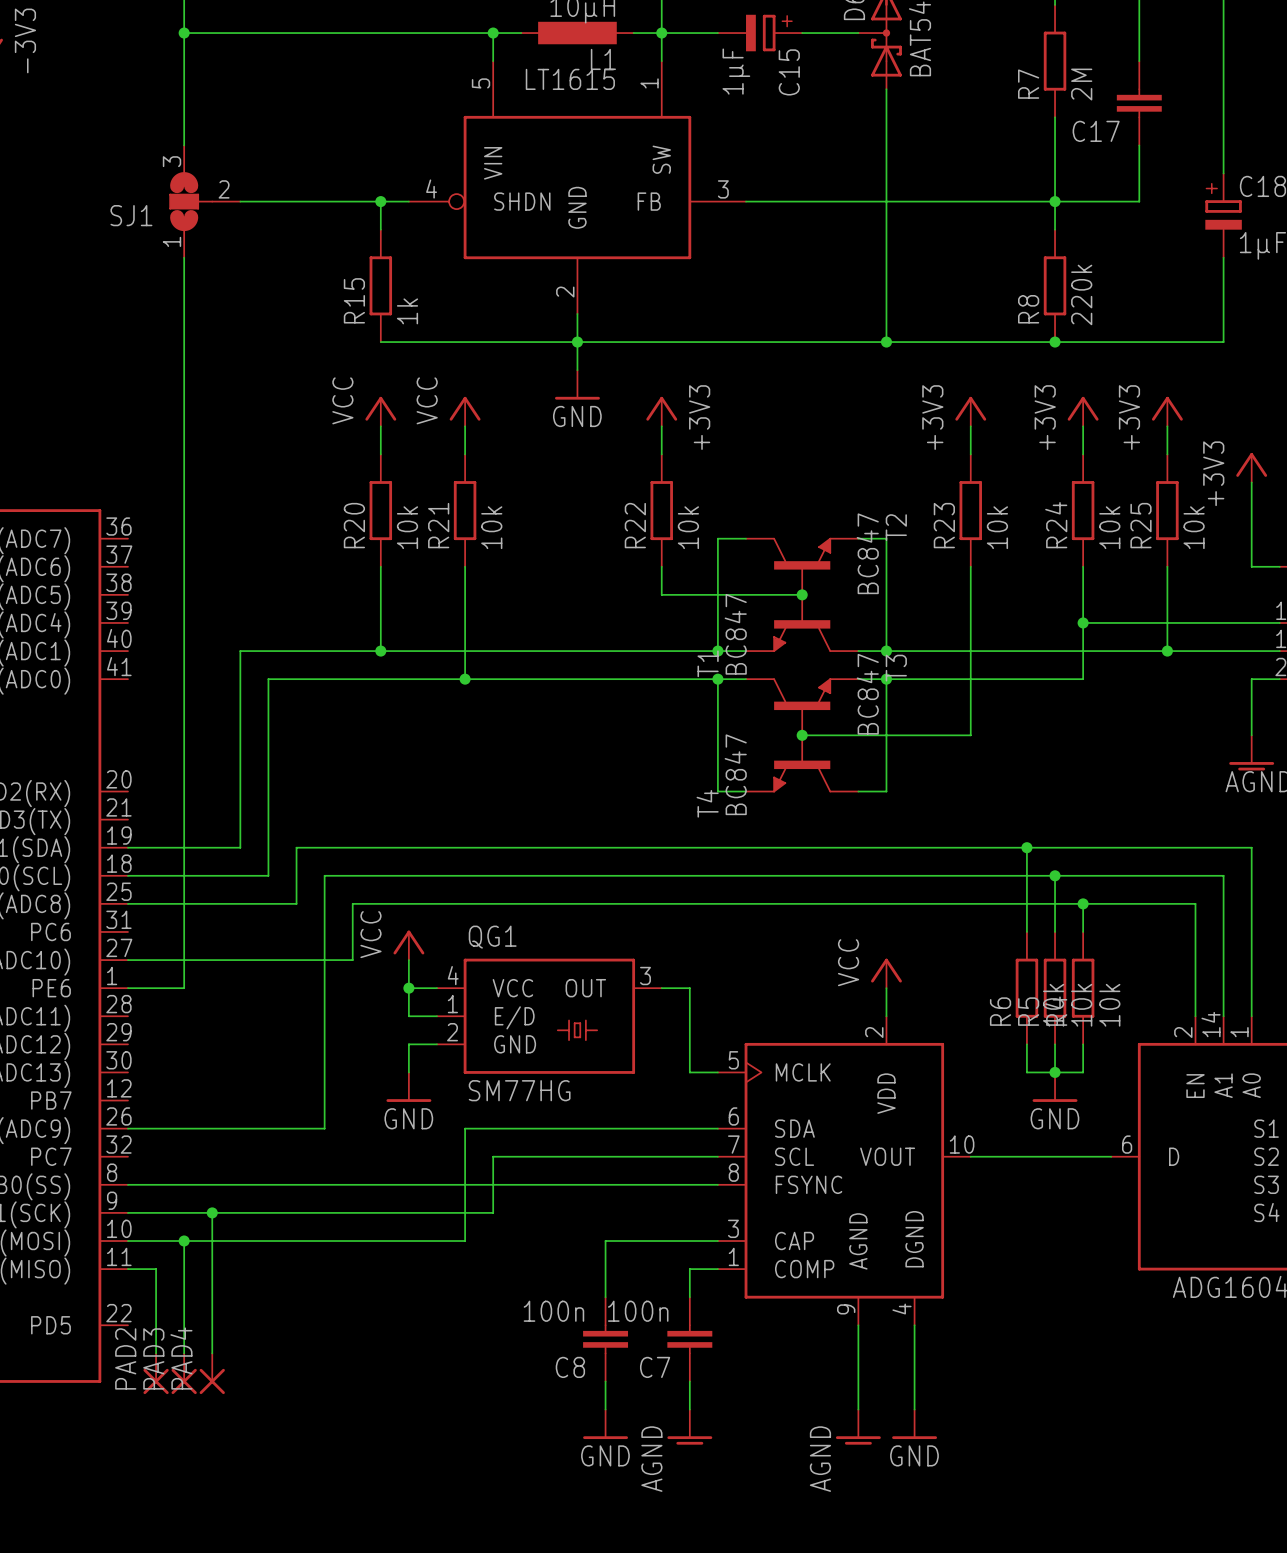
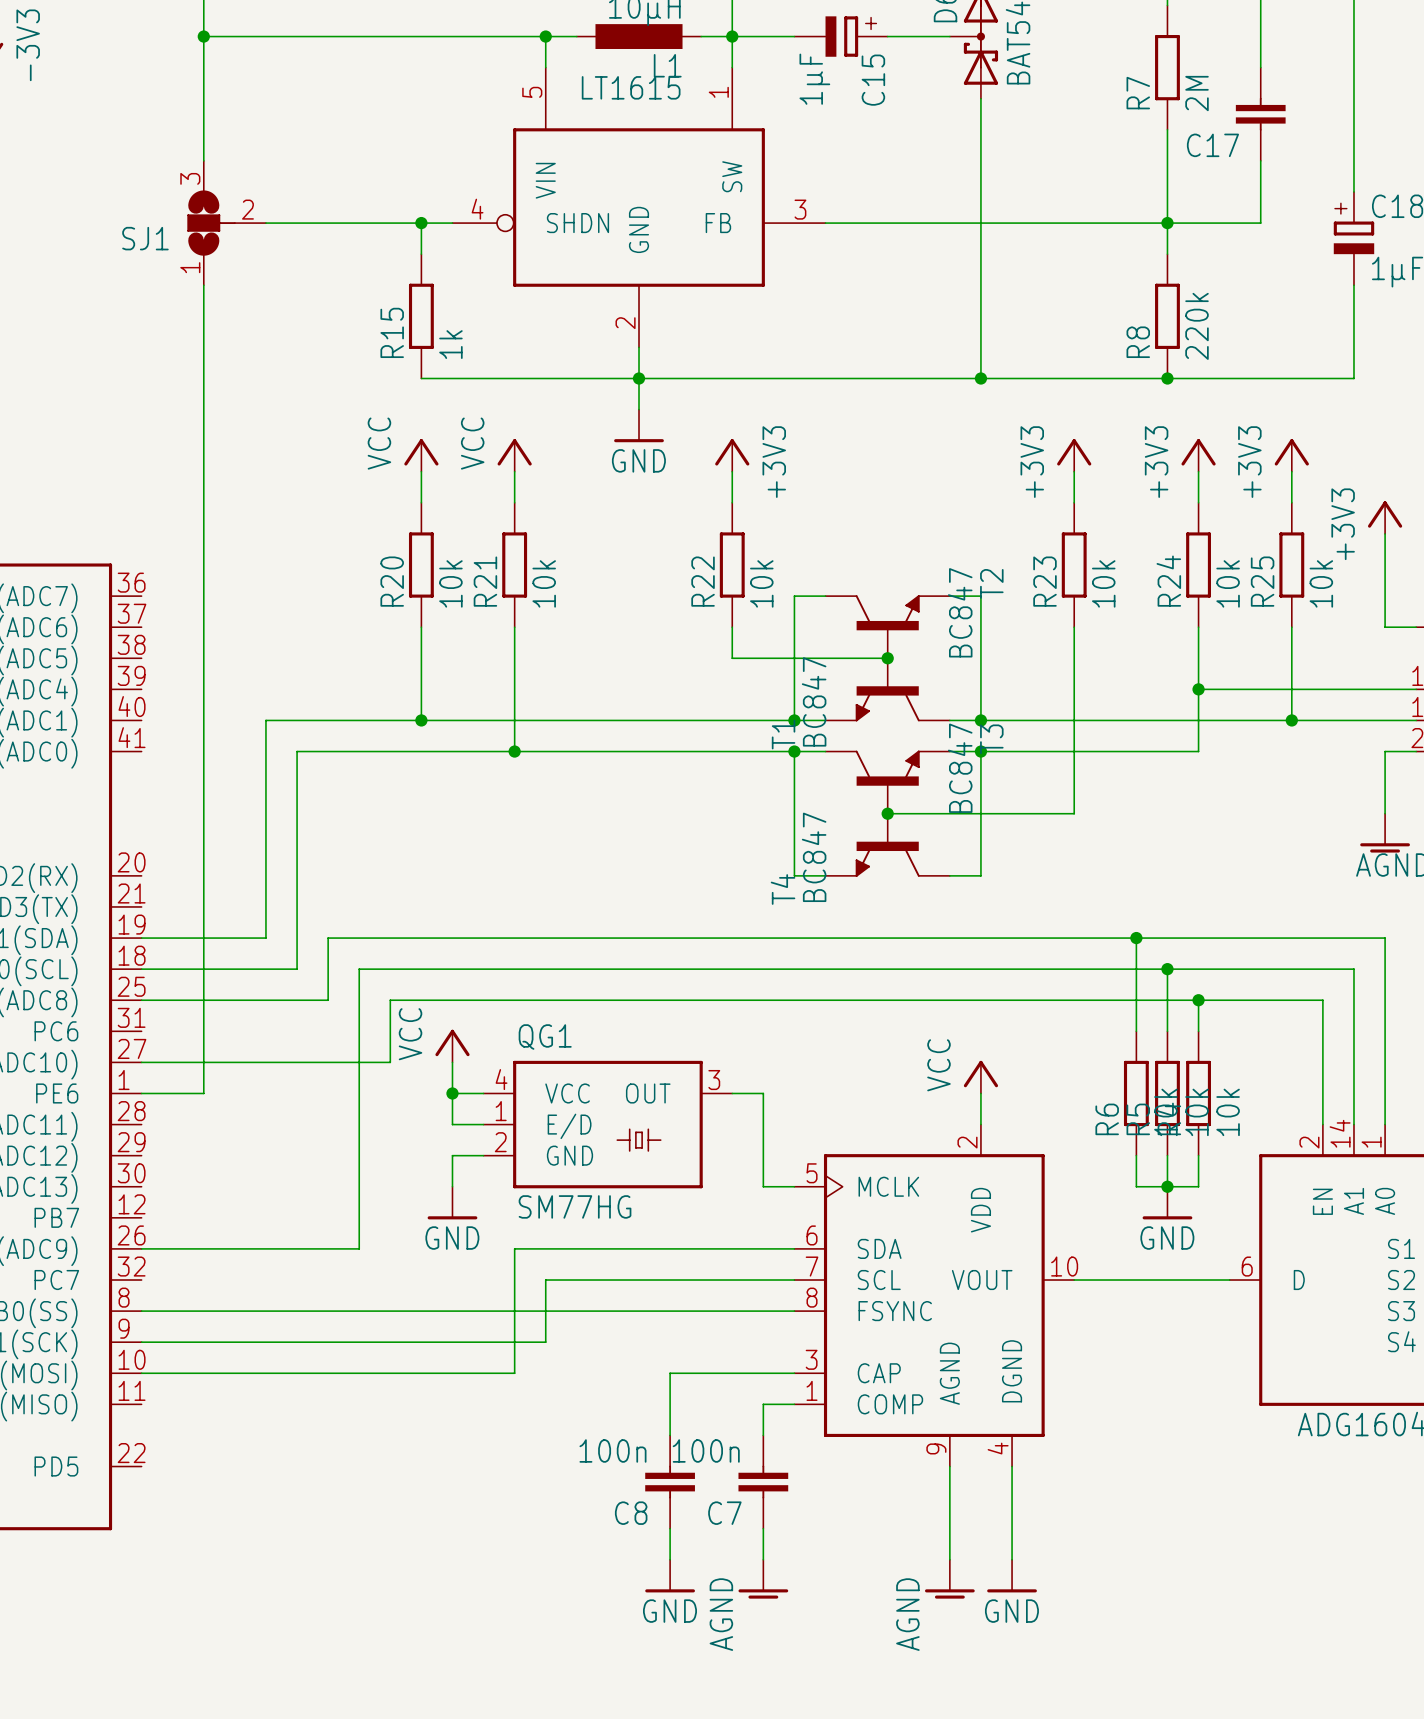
wire: (212, 1212) (212, 1353) -> none
junction: (212, 1212) -> none
wire: (184, 1241) (184, 1353) -> none
junction: (184, 1241) -> none
wire: (127, 1269) (156, 1269) (156, 1353) -> none
PAD2: (156, 1373) -> none
PAD3: (184, 1373) -> none
PAD4: (212, 1373) -> none

